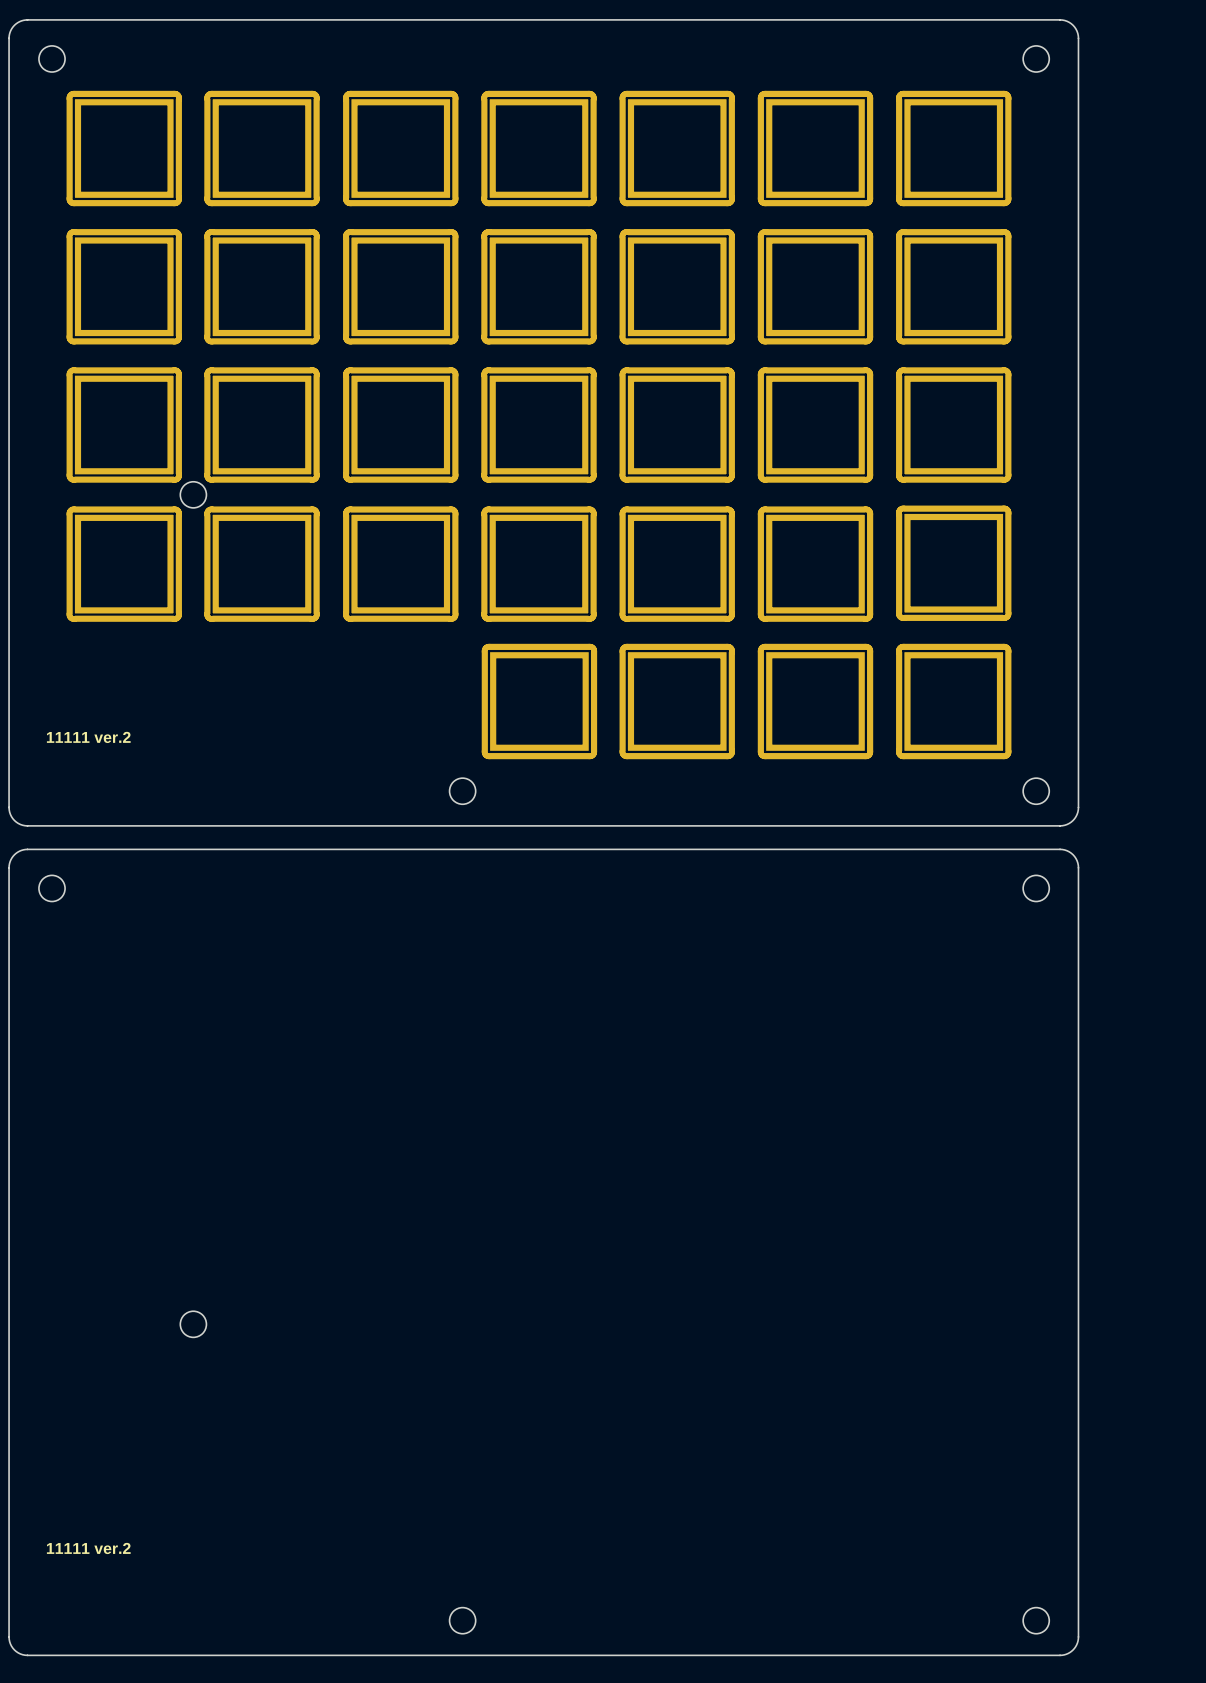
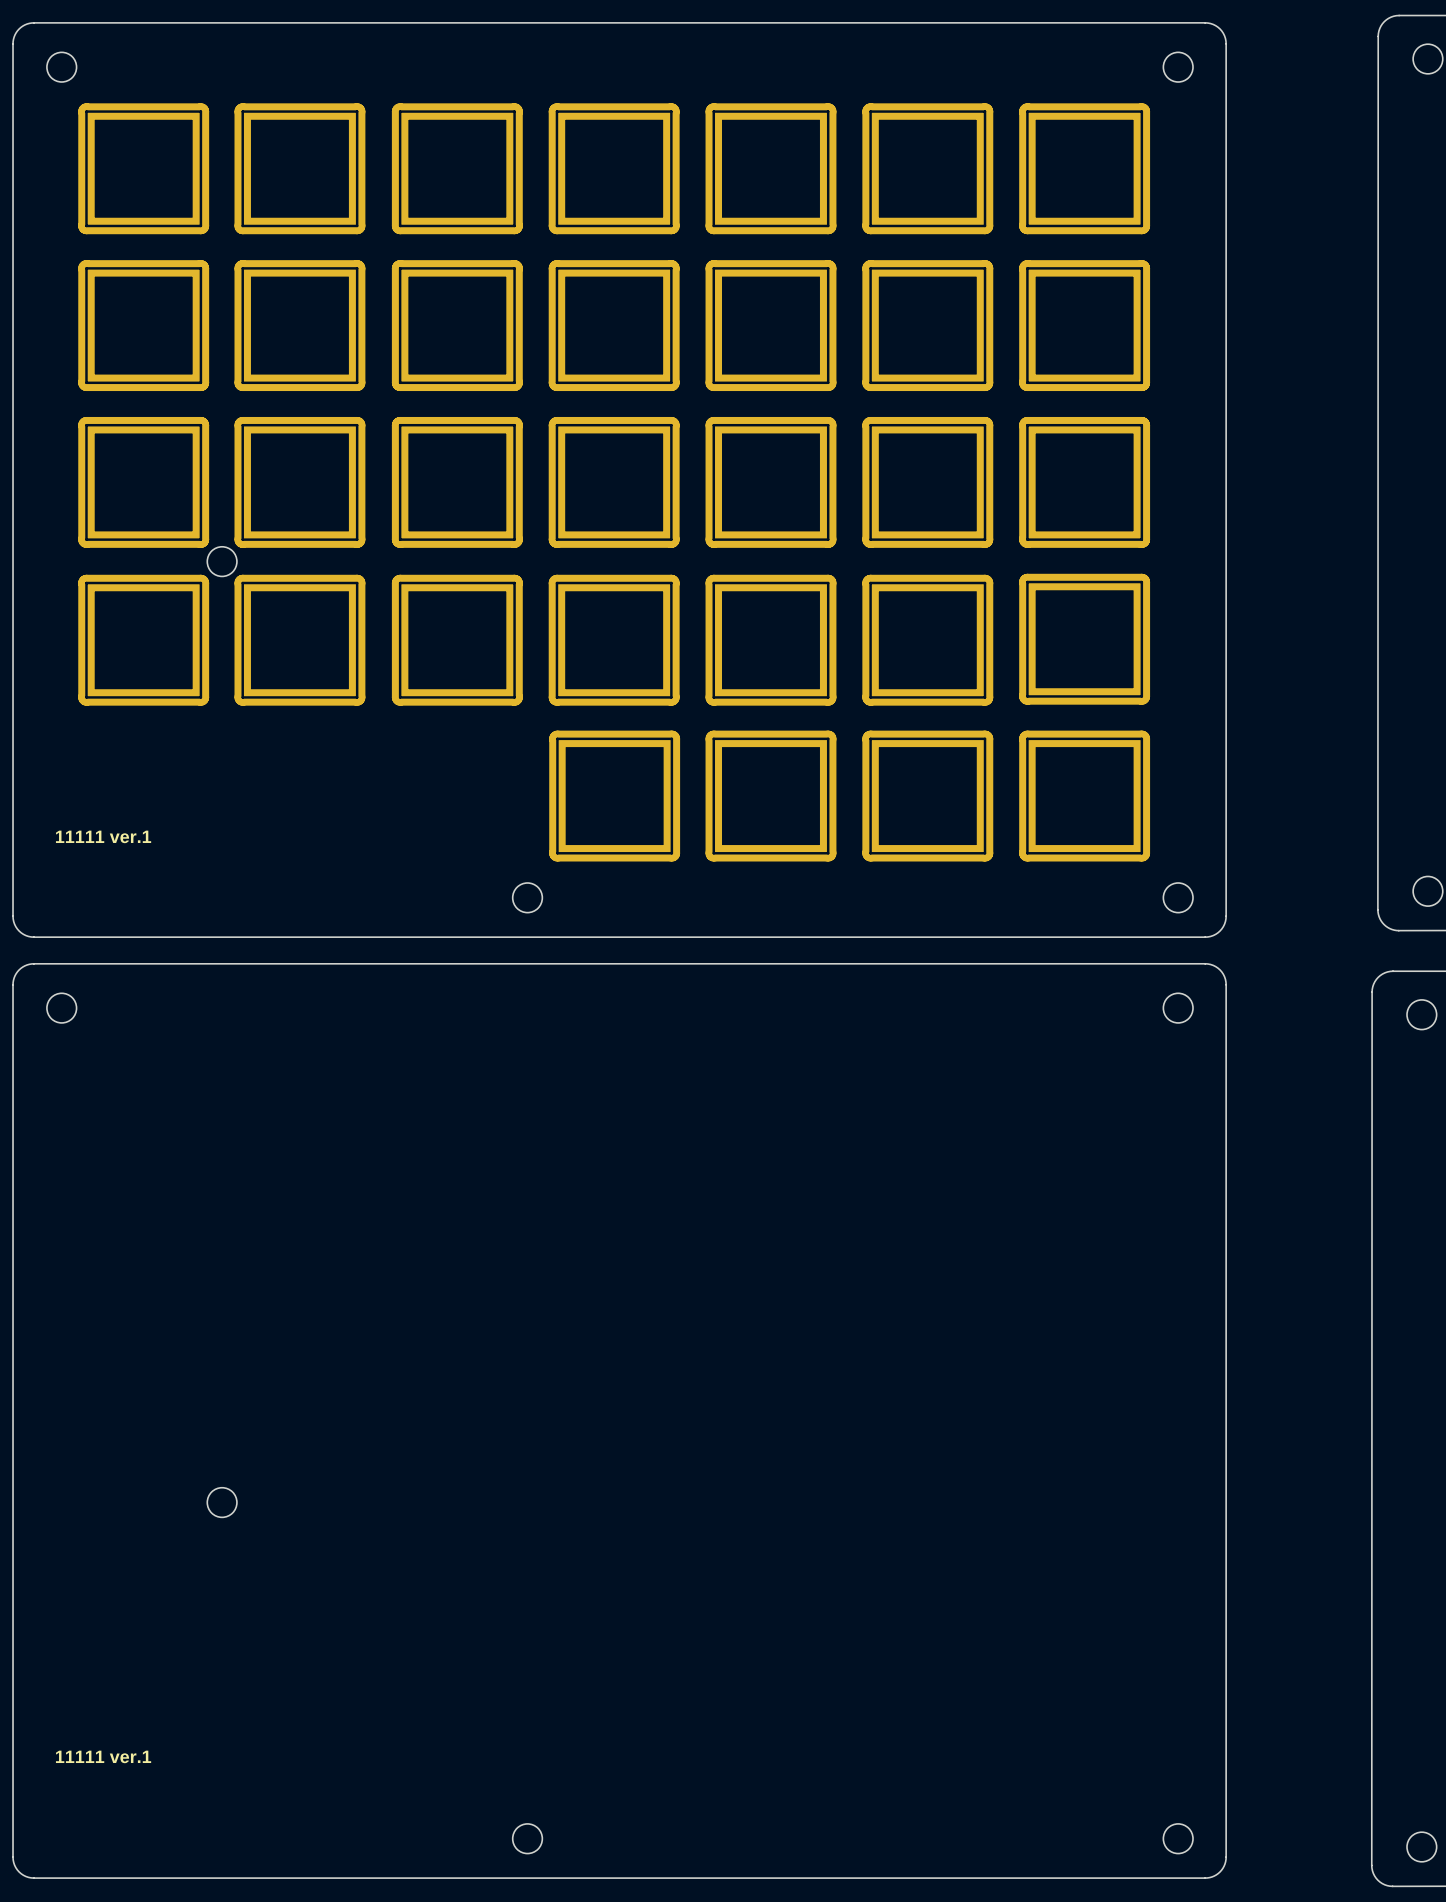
text: 11111 ver.2 (88, 737) -> 11111 ver.1 (103, 836)
text: 11111 ver.2 (88, 1548) -> 11111 ver.1 (103, 1756)

